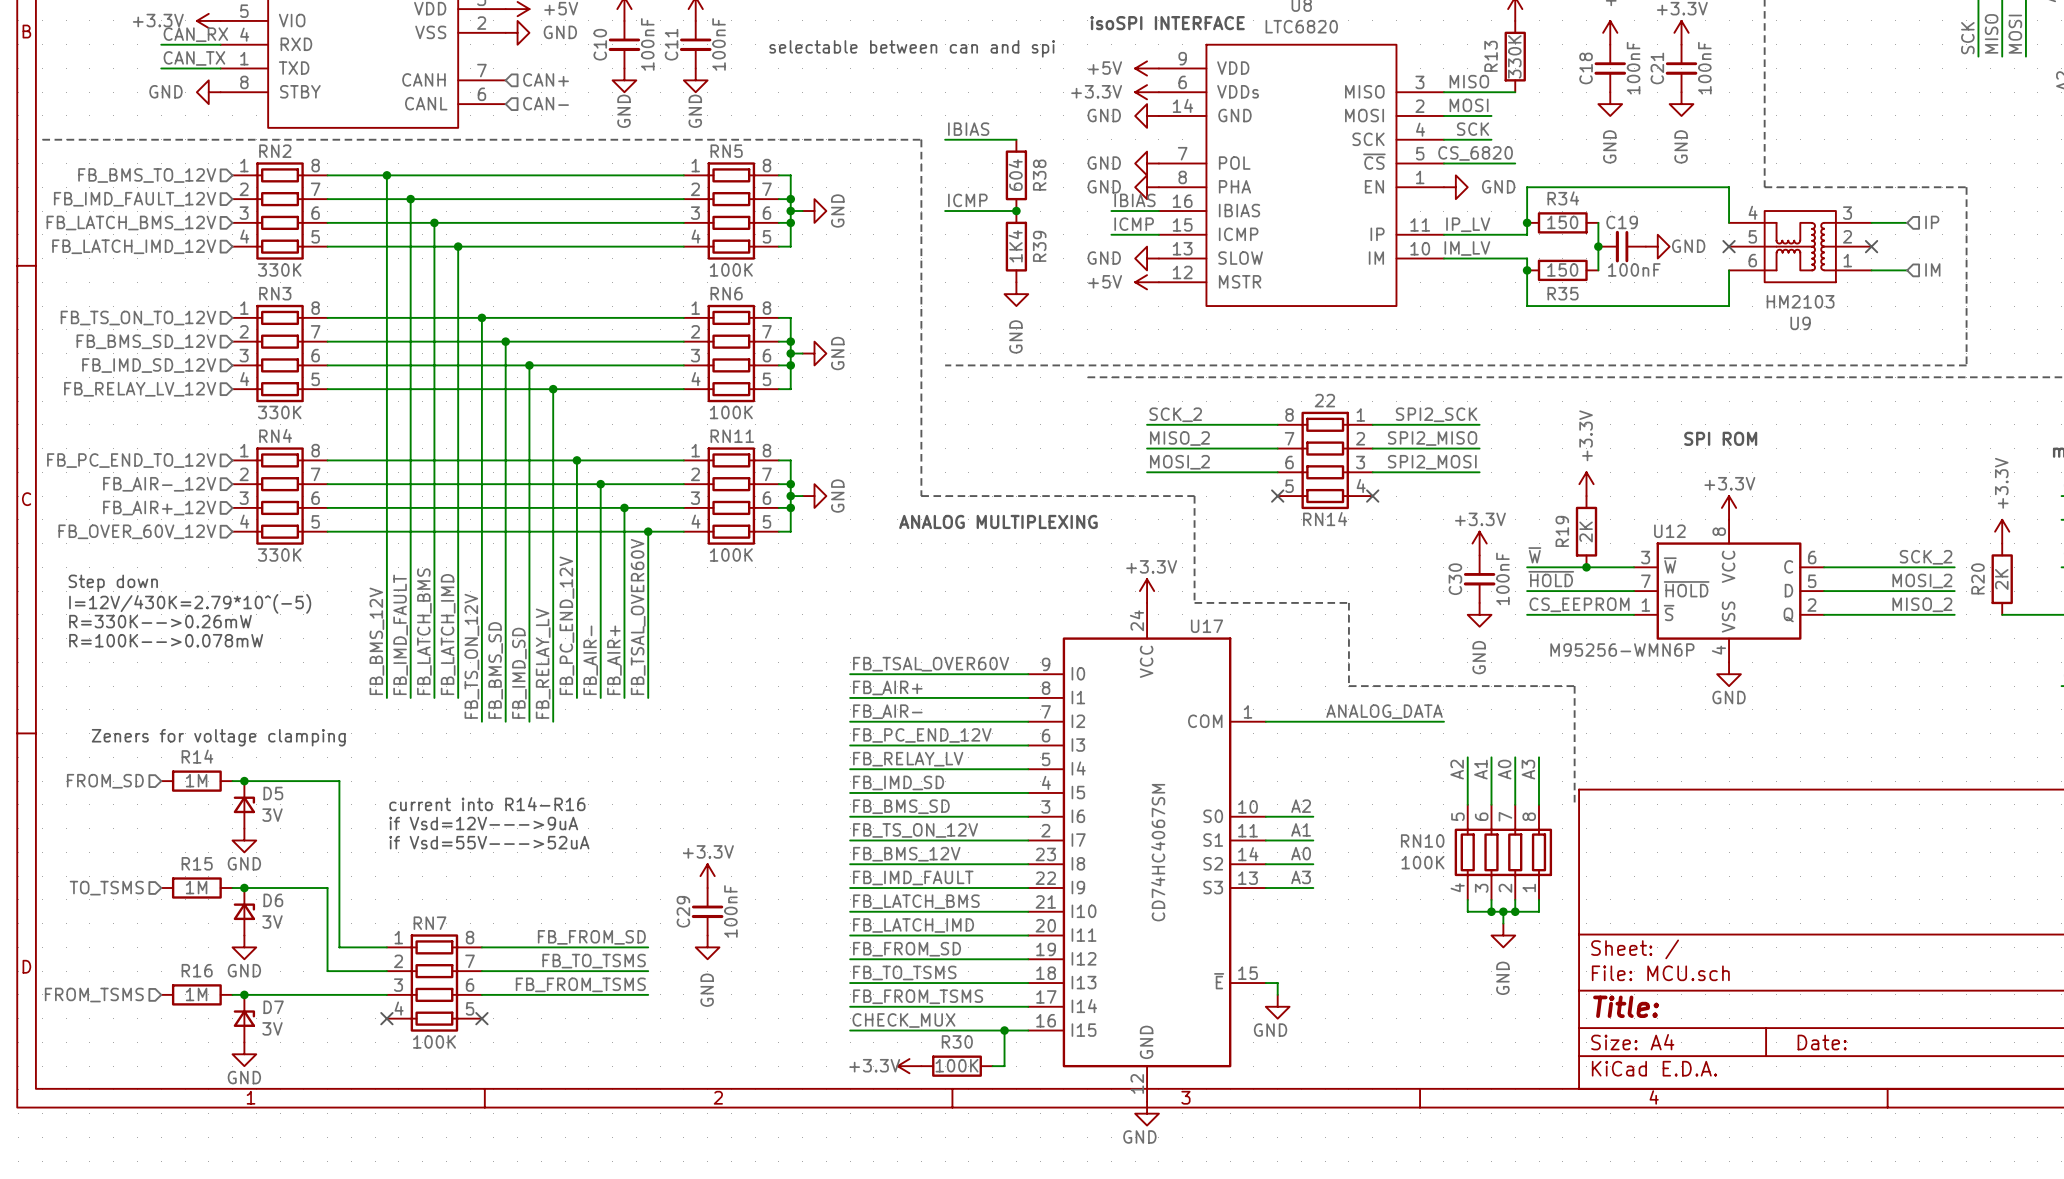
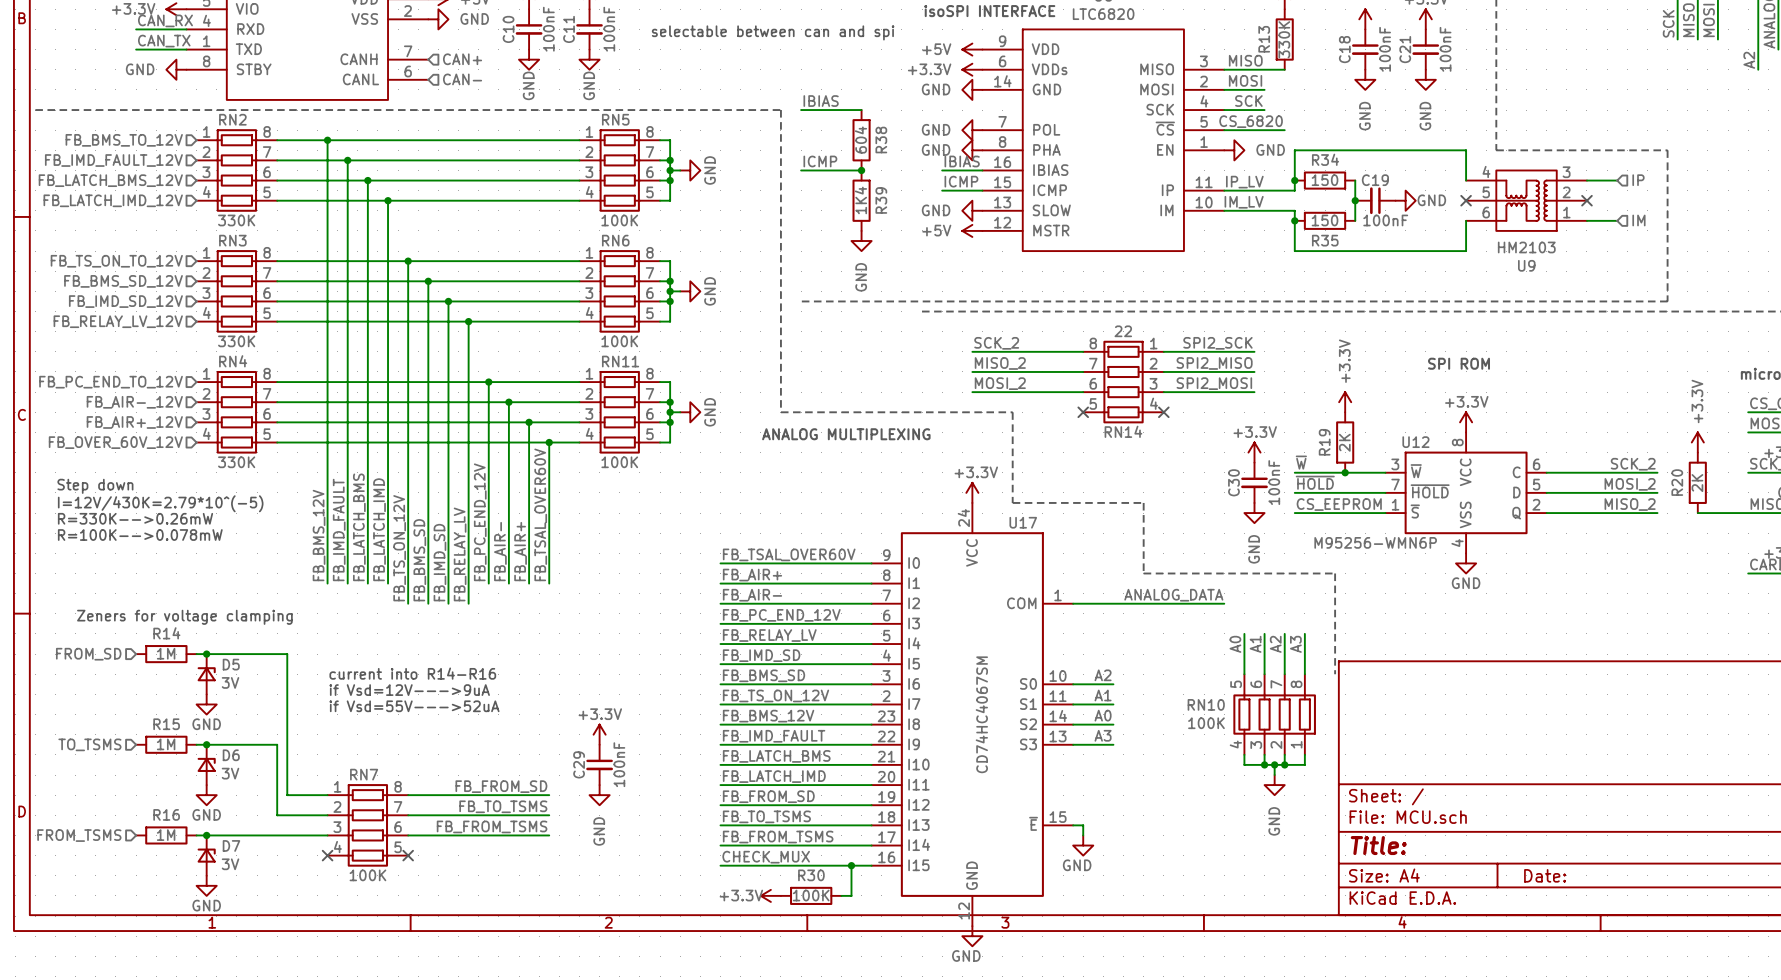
label: A2 (1457, 769) -> A0 (1235, 644)
label: A0 (1504, 769) -> A2 (1275, 644)

